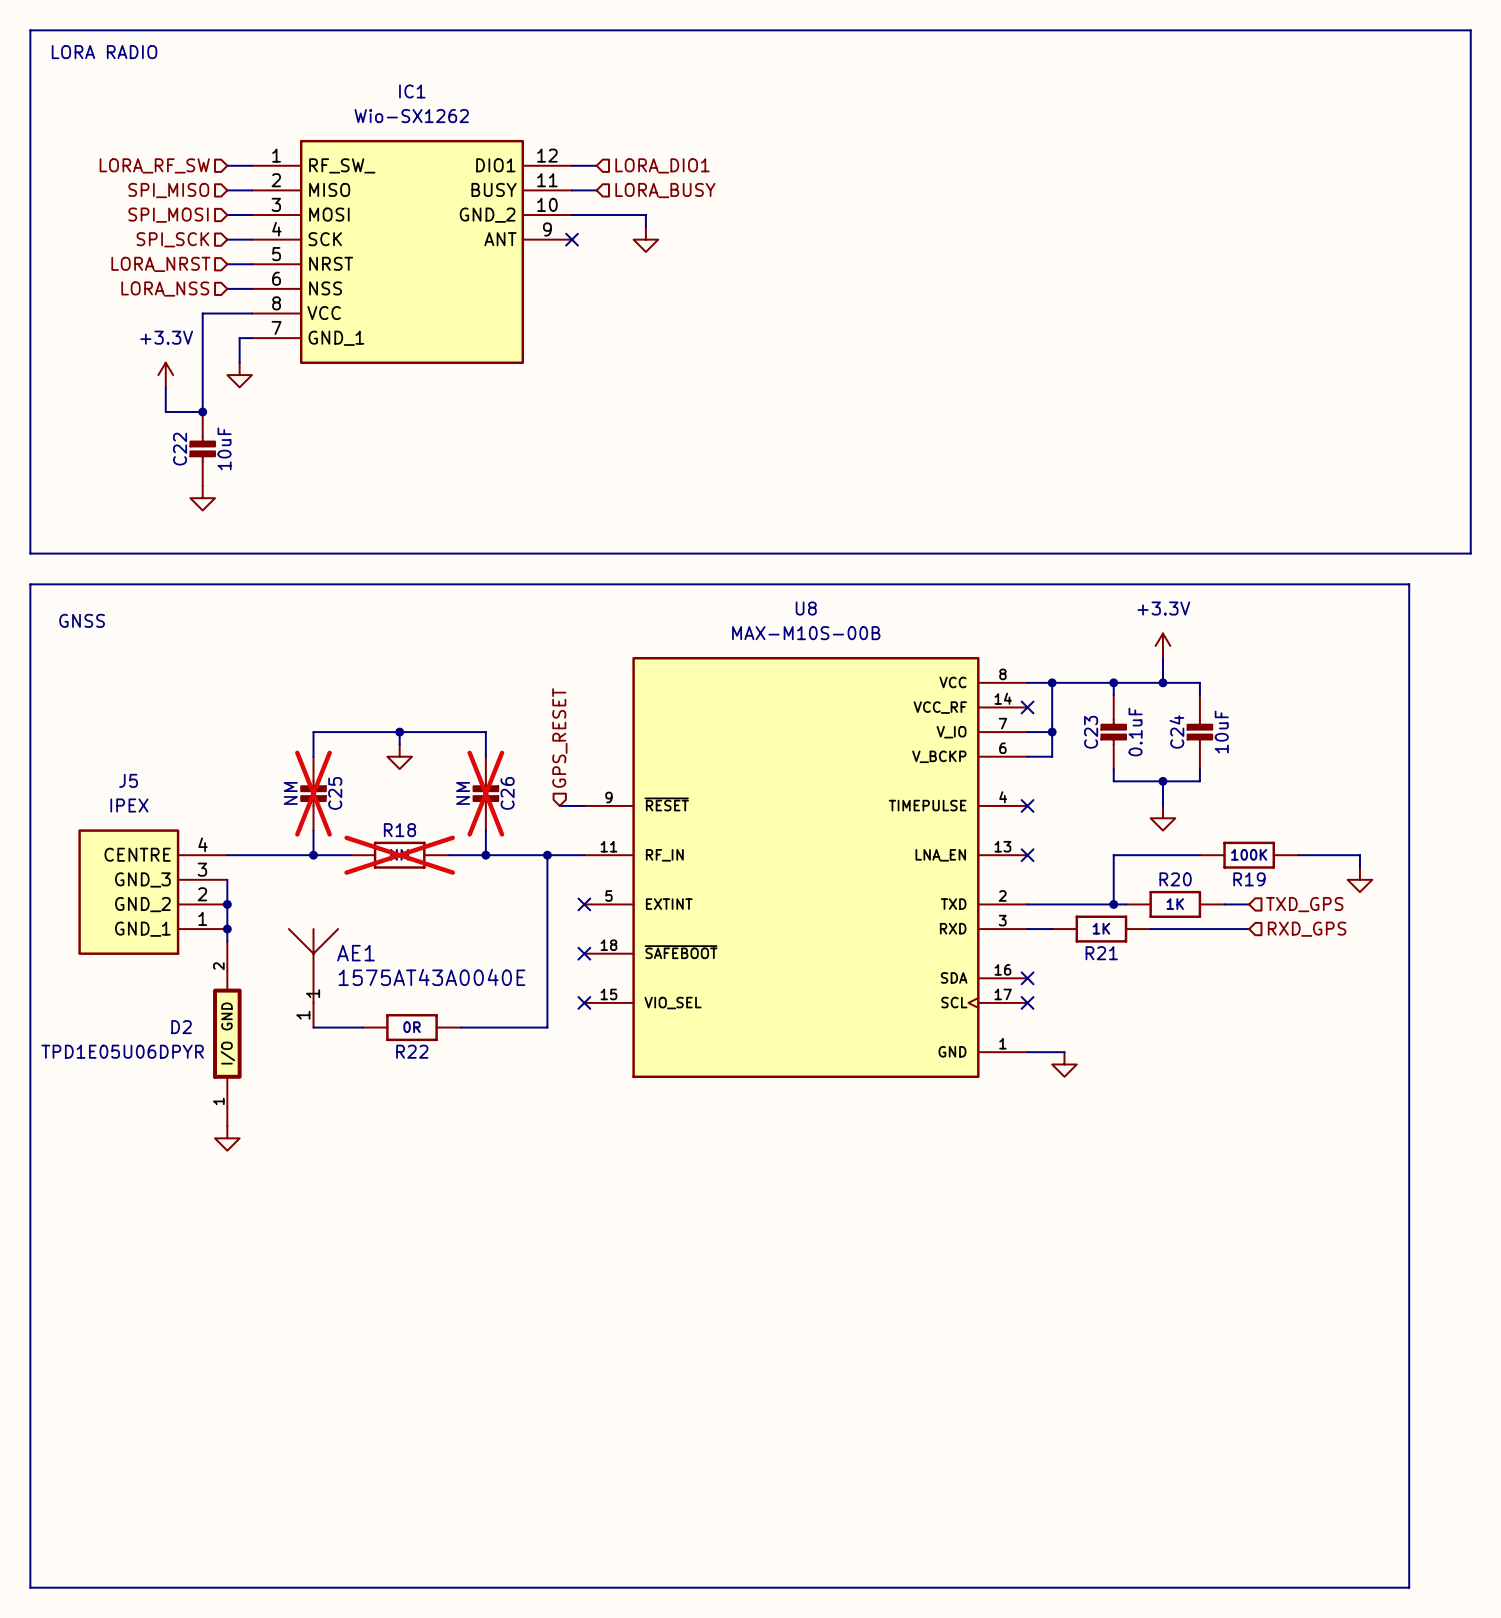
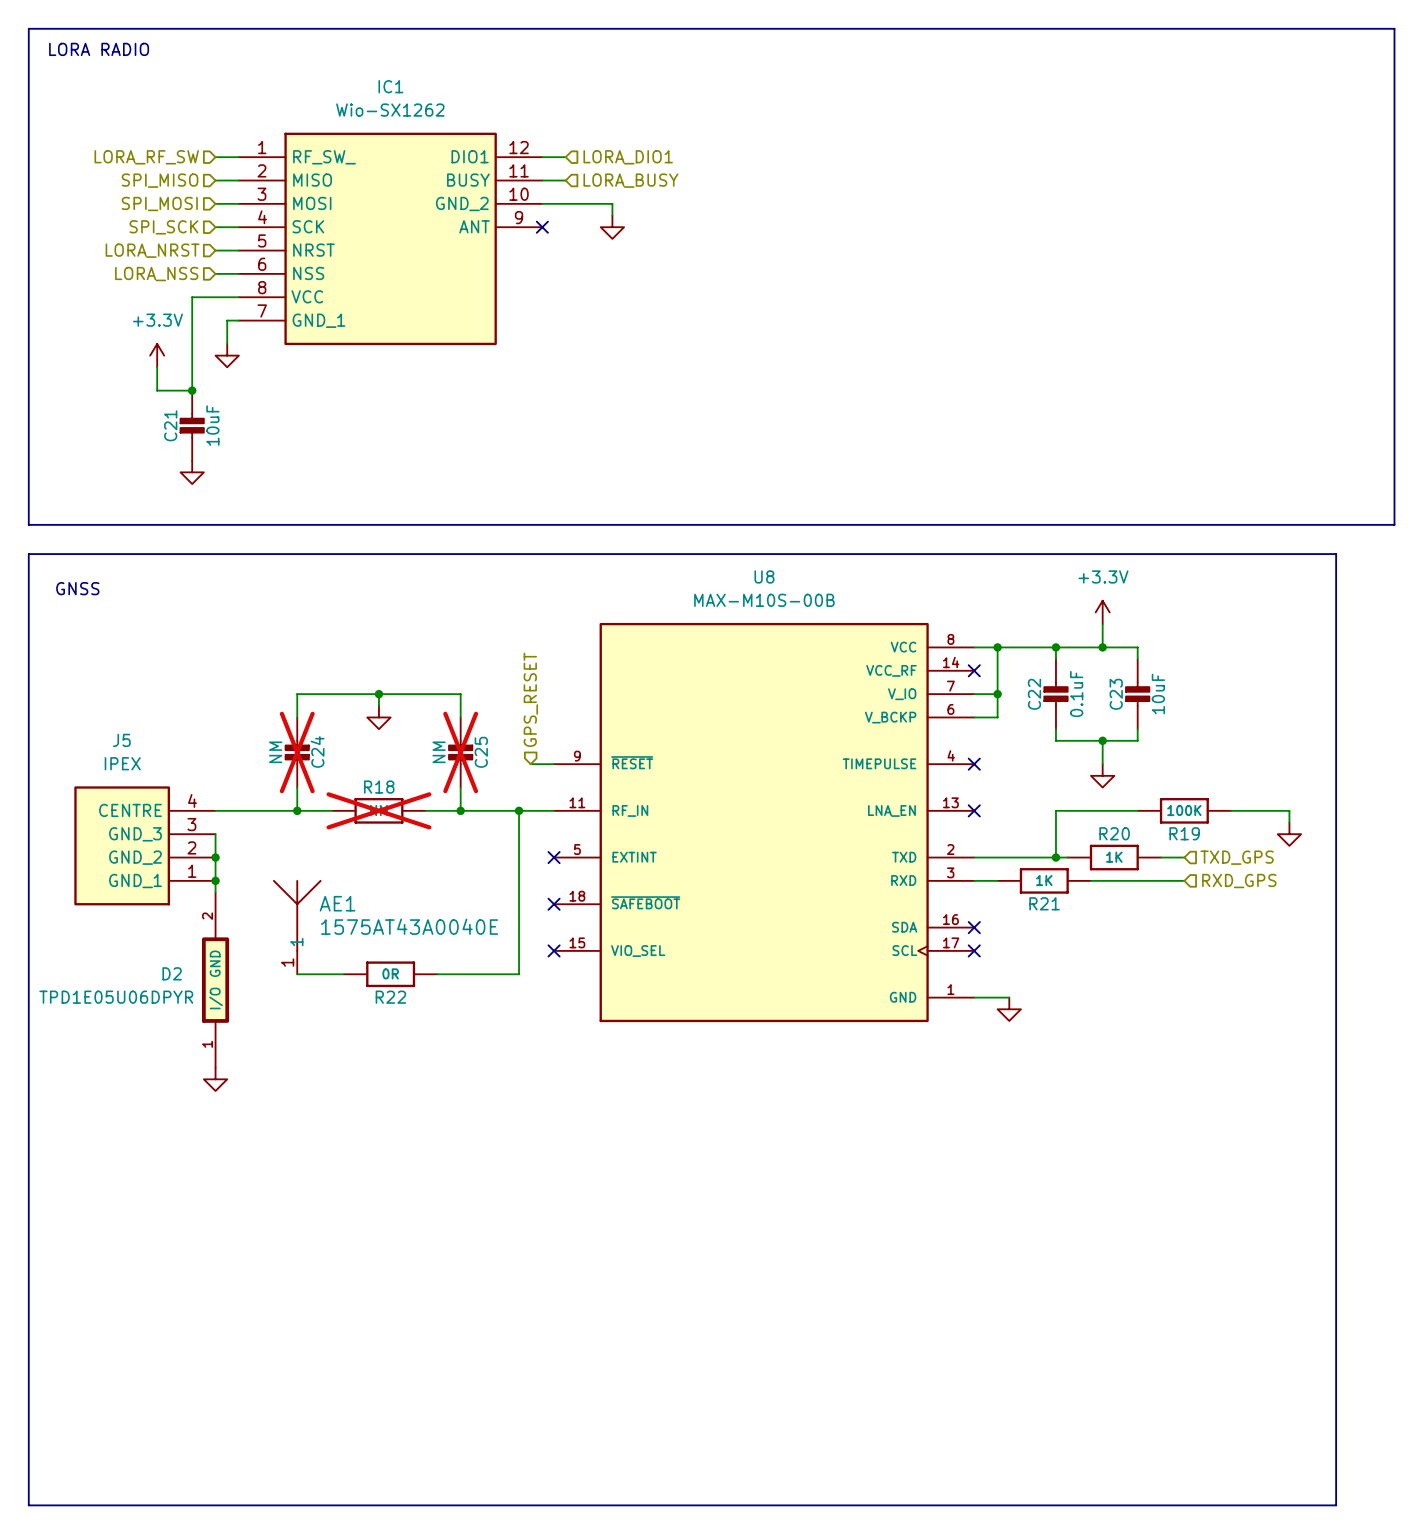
C22 name: C22 (180, 449) -> C21 (170, 425)
C24 name: C24 (1176, 731) -> C23 (1116, 694)
C23 name: C23 (1091, 732) -> C22 (1034, 694)
C25 name: C25 (335, 793) -> C24 (317, 752)
C26 name: C26 (507, 793) -> C25 (481, 752)

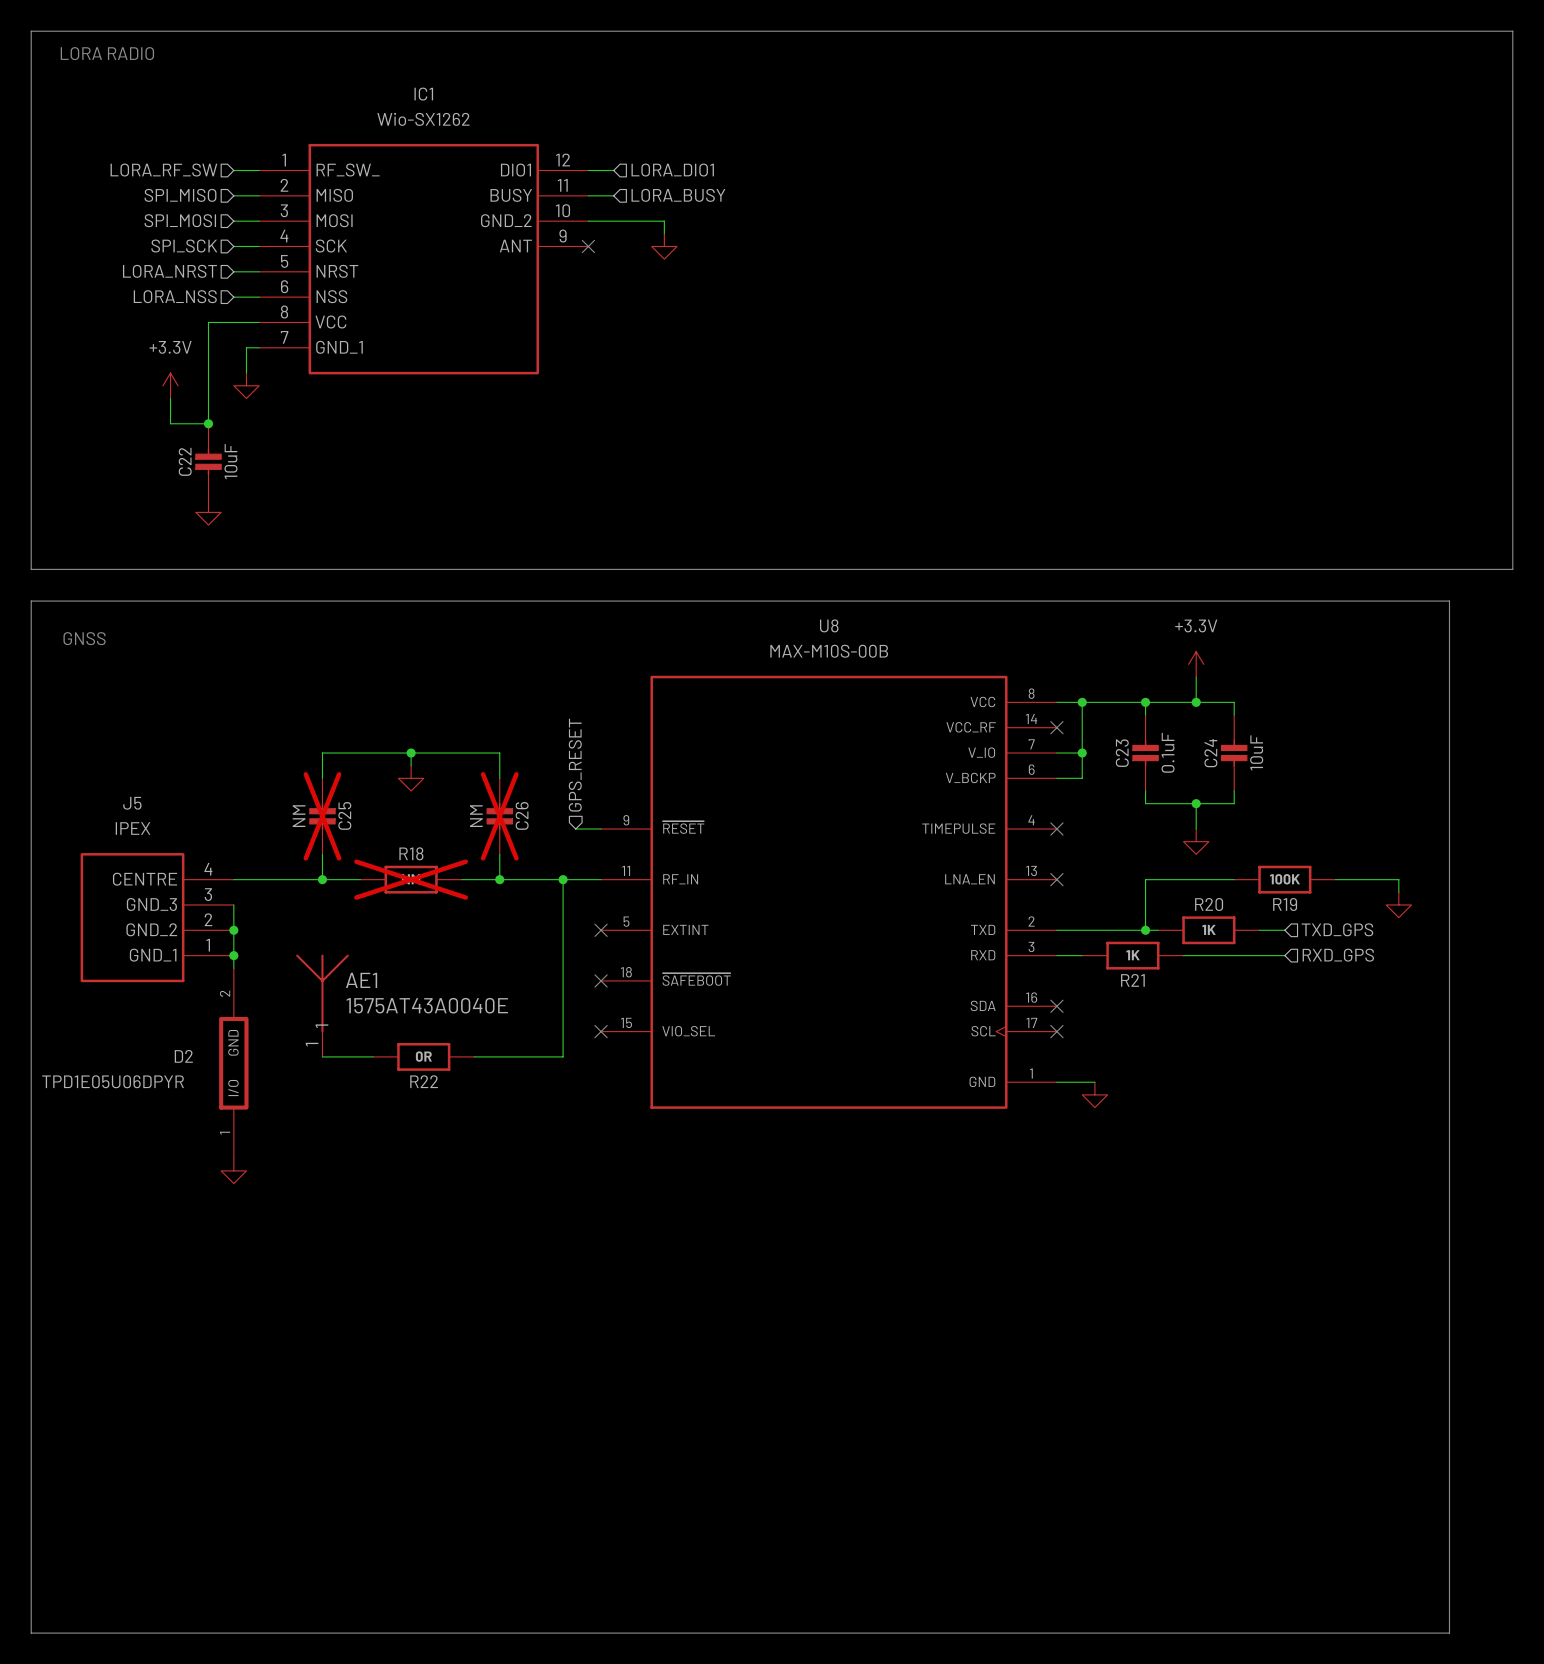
C21 name: C21 (170, 425) -> C22 (185, 461)
C22 name: C22 (1034, 694) -> C23 (1122, 753)
C23 name: C23 (1116, 694) -> C24 (1210, 753)
C24 name: C24 (317, 752) -> C25 (344, 815)
C25 name: C25 (481, 752) -> C26 (522, 815)

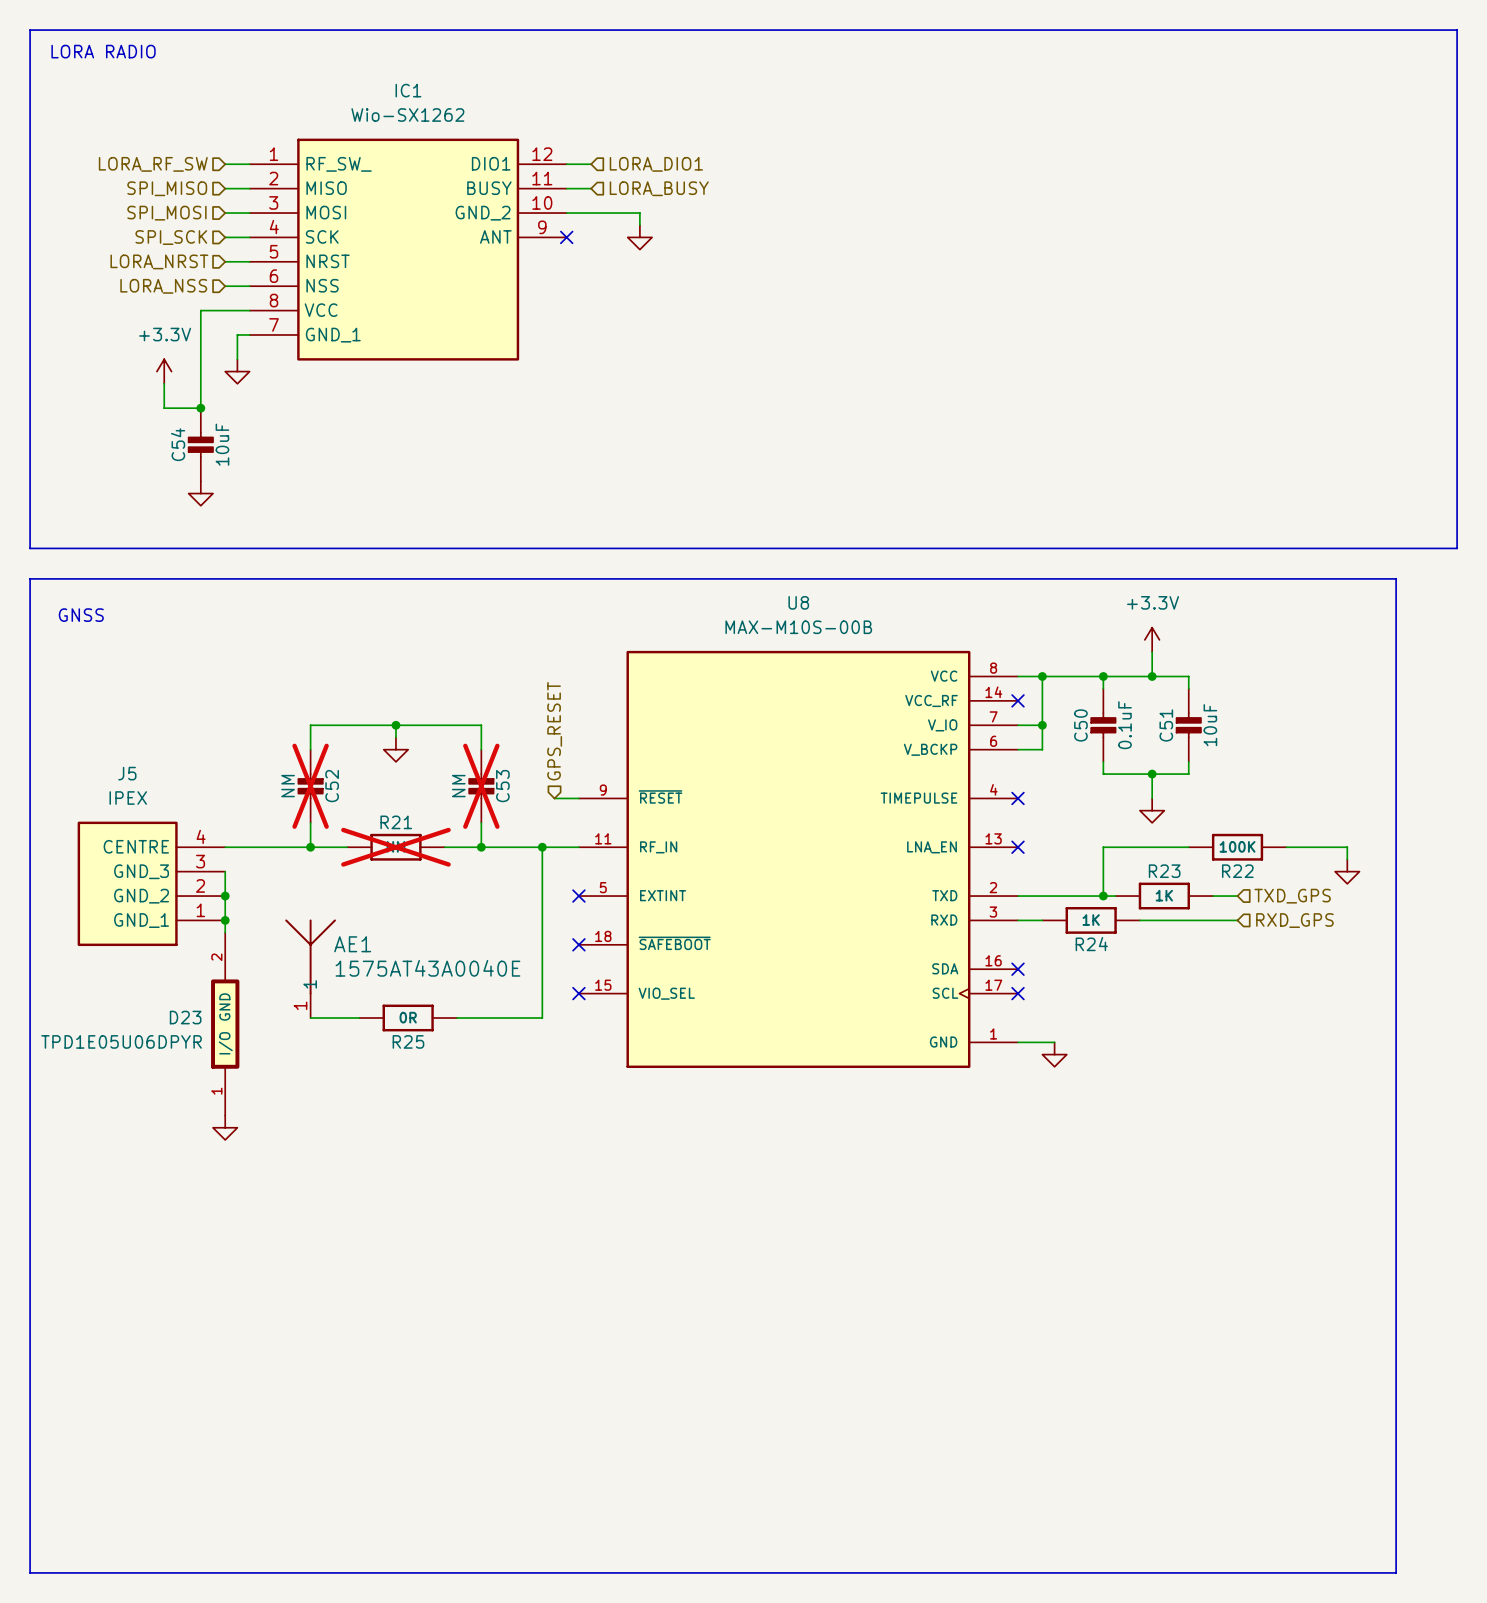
C22 name: C22 (185, 461) -> C54 (178, 444)
C23 name: C23 (1122, 753) -> C50 (1080, 725)
C24 name: C24 (1210, 753) -> C51 (1166, 725)
C25 name: C25 (344, 815) -> C52 (332, 786)
C26 name: C26 (522, 815) -> C53 (502, 786)
R18 name: R18 (411, 853) -> R21 (396, 822)
R20 name: R20 (1209, 904) -> R23 (1164, 871)
R19 name: R19 (1285, 904) -> R22 (1237, 871)
R21 name: R21 (1132, 980) -> R24 (1091, 944)
D2 name: D2 (183, 1056) -> D23 (185, 1017)
R22 name: R22 (424, 1081) -> R25 (408, 1041)

